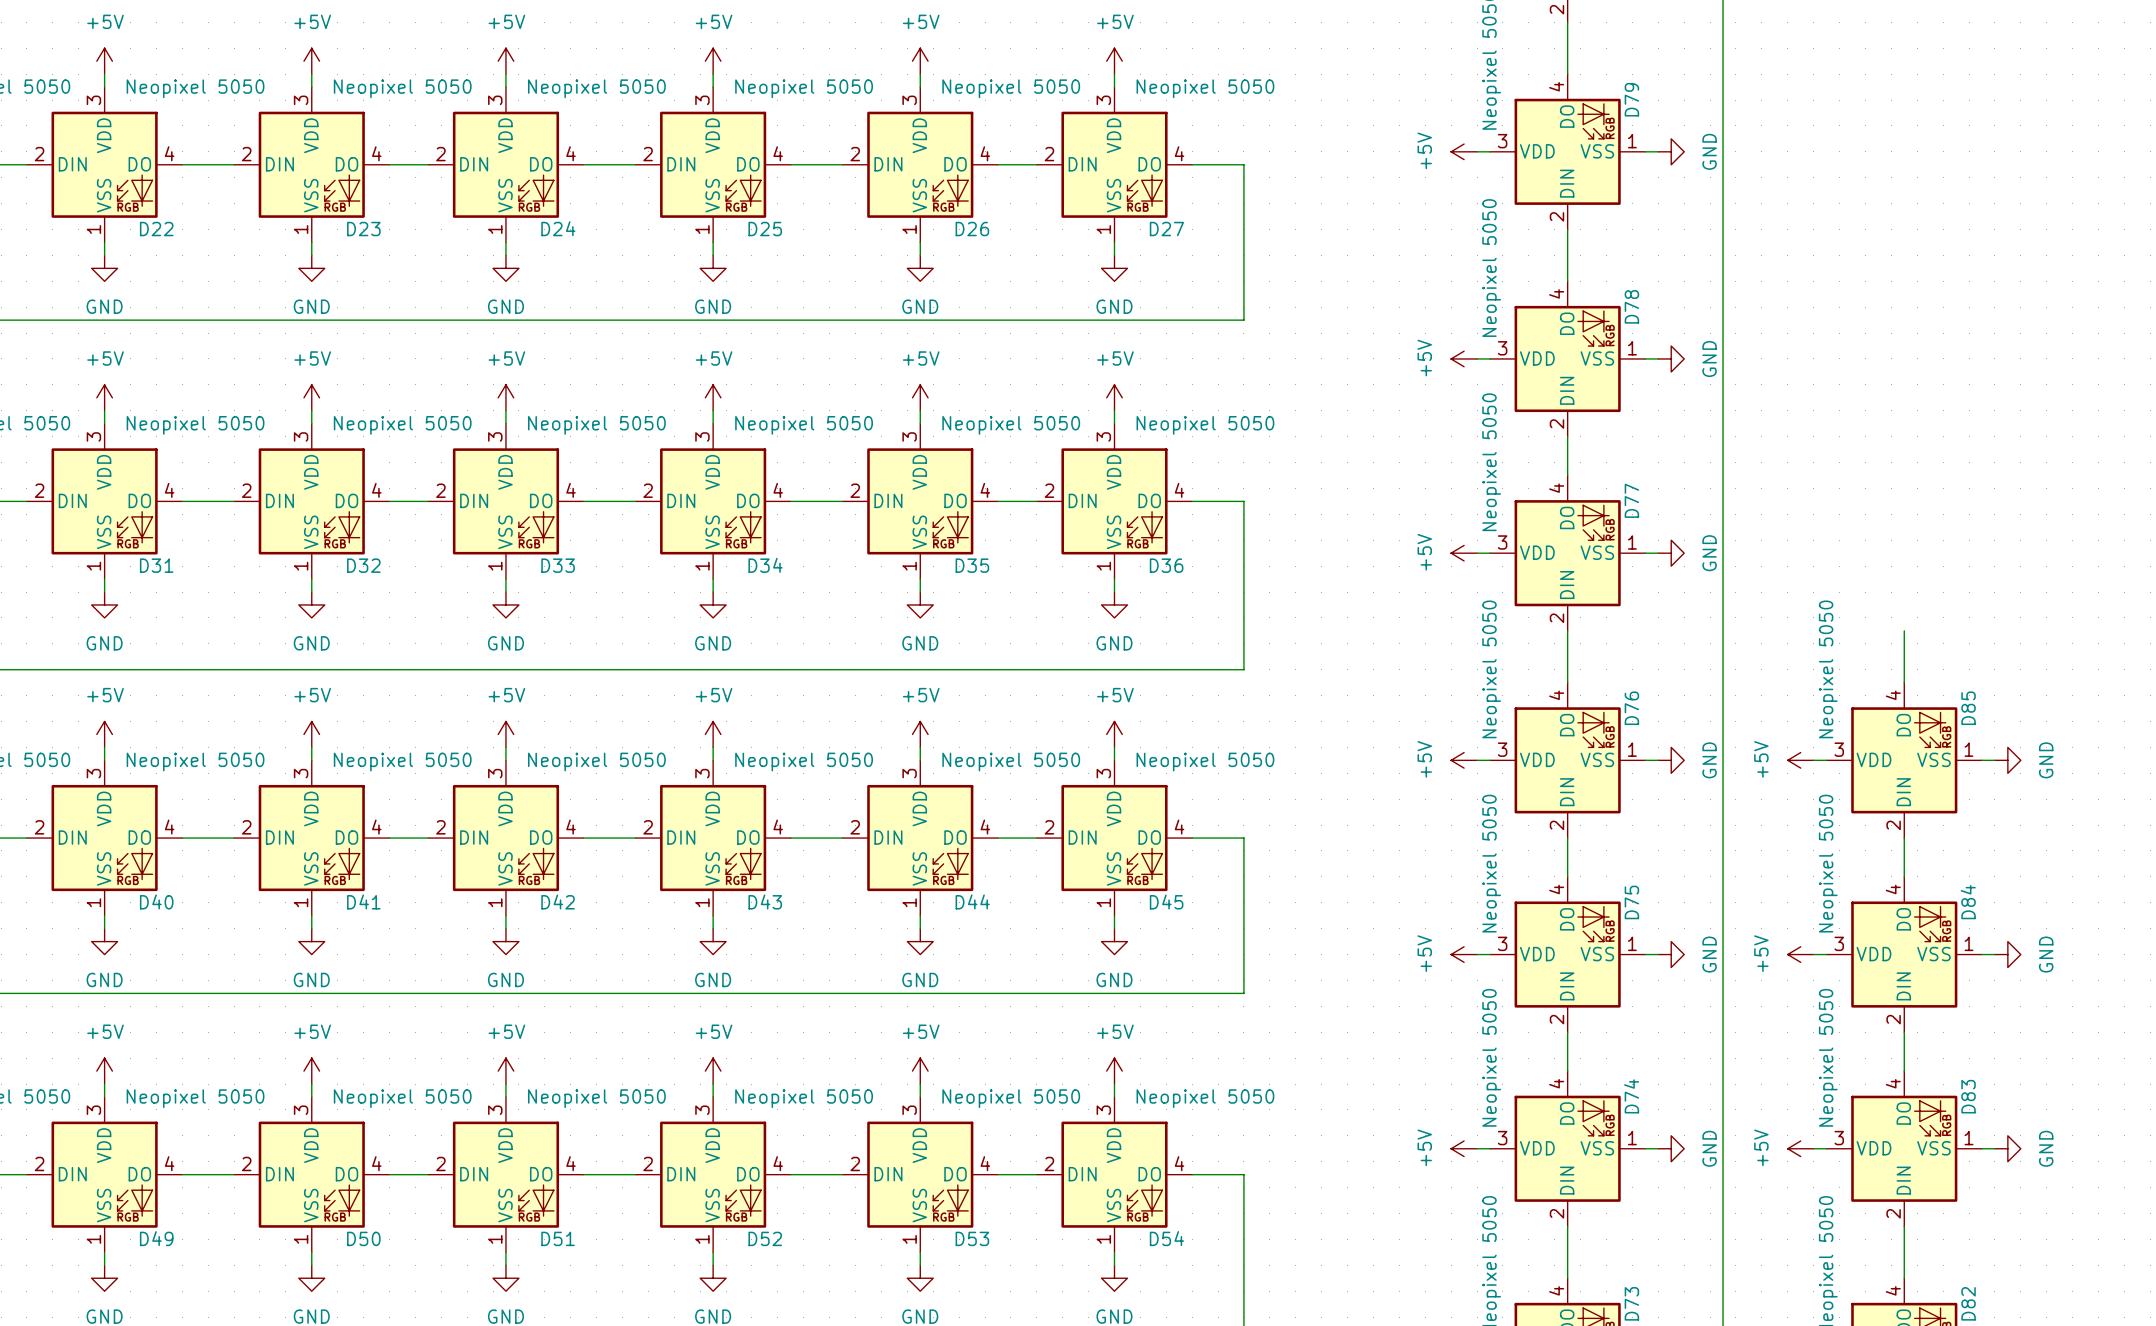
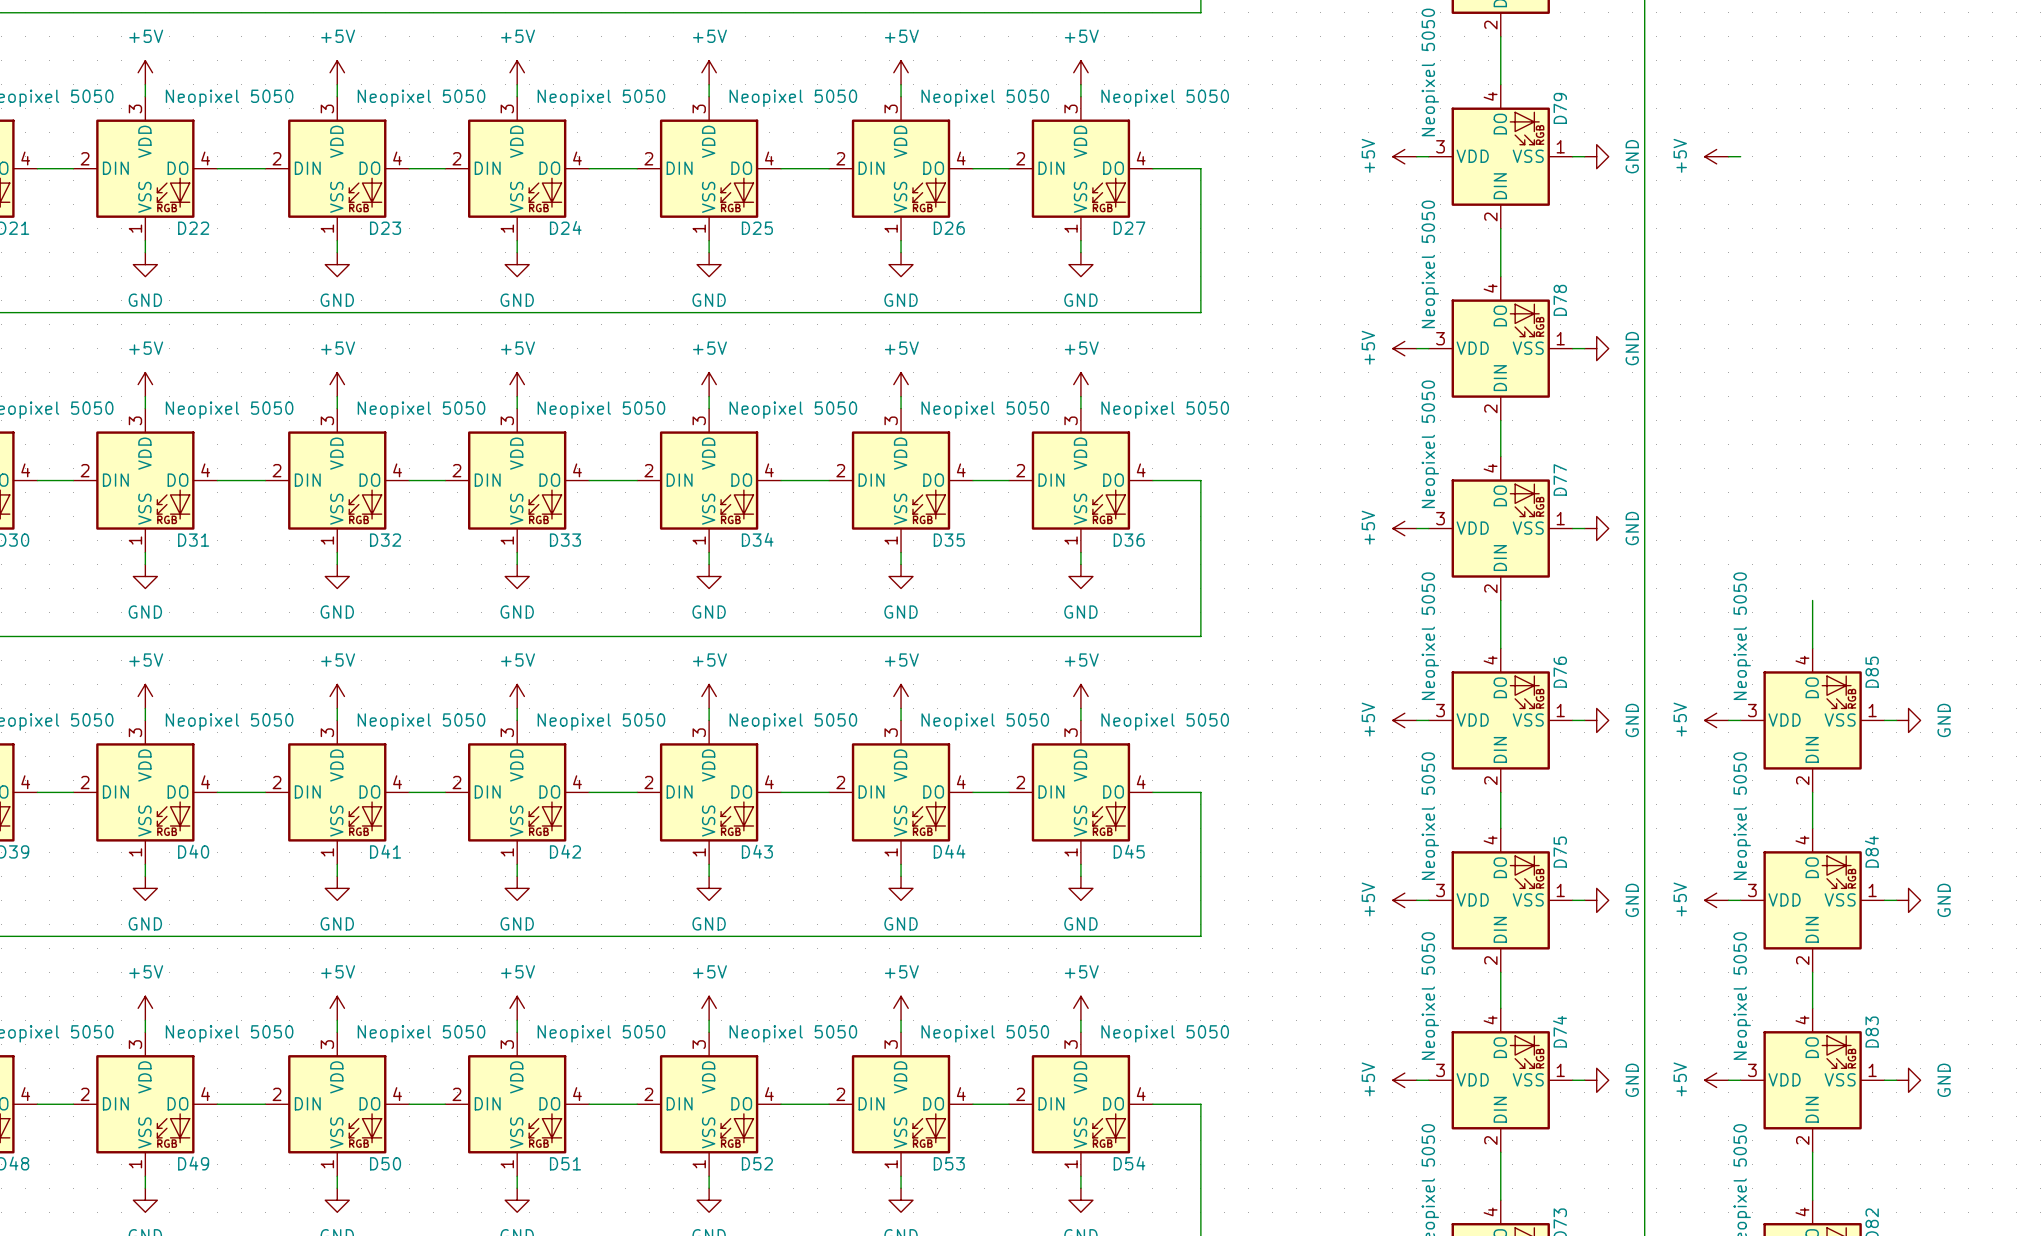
power symbol: none -> +5V (1716, 156)
wire: none -> (1728, 156) (1740, 156)

